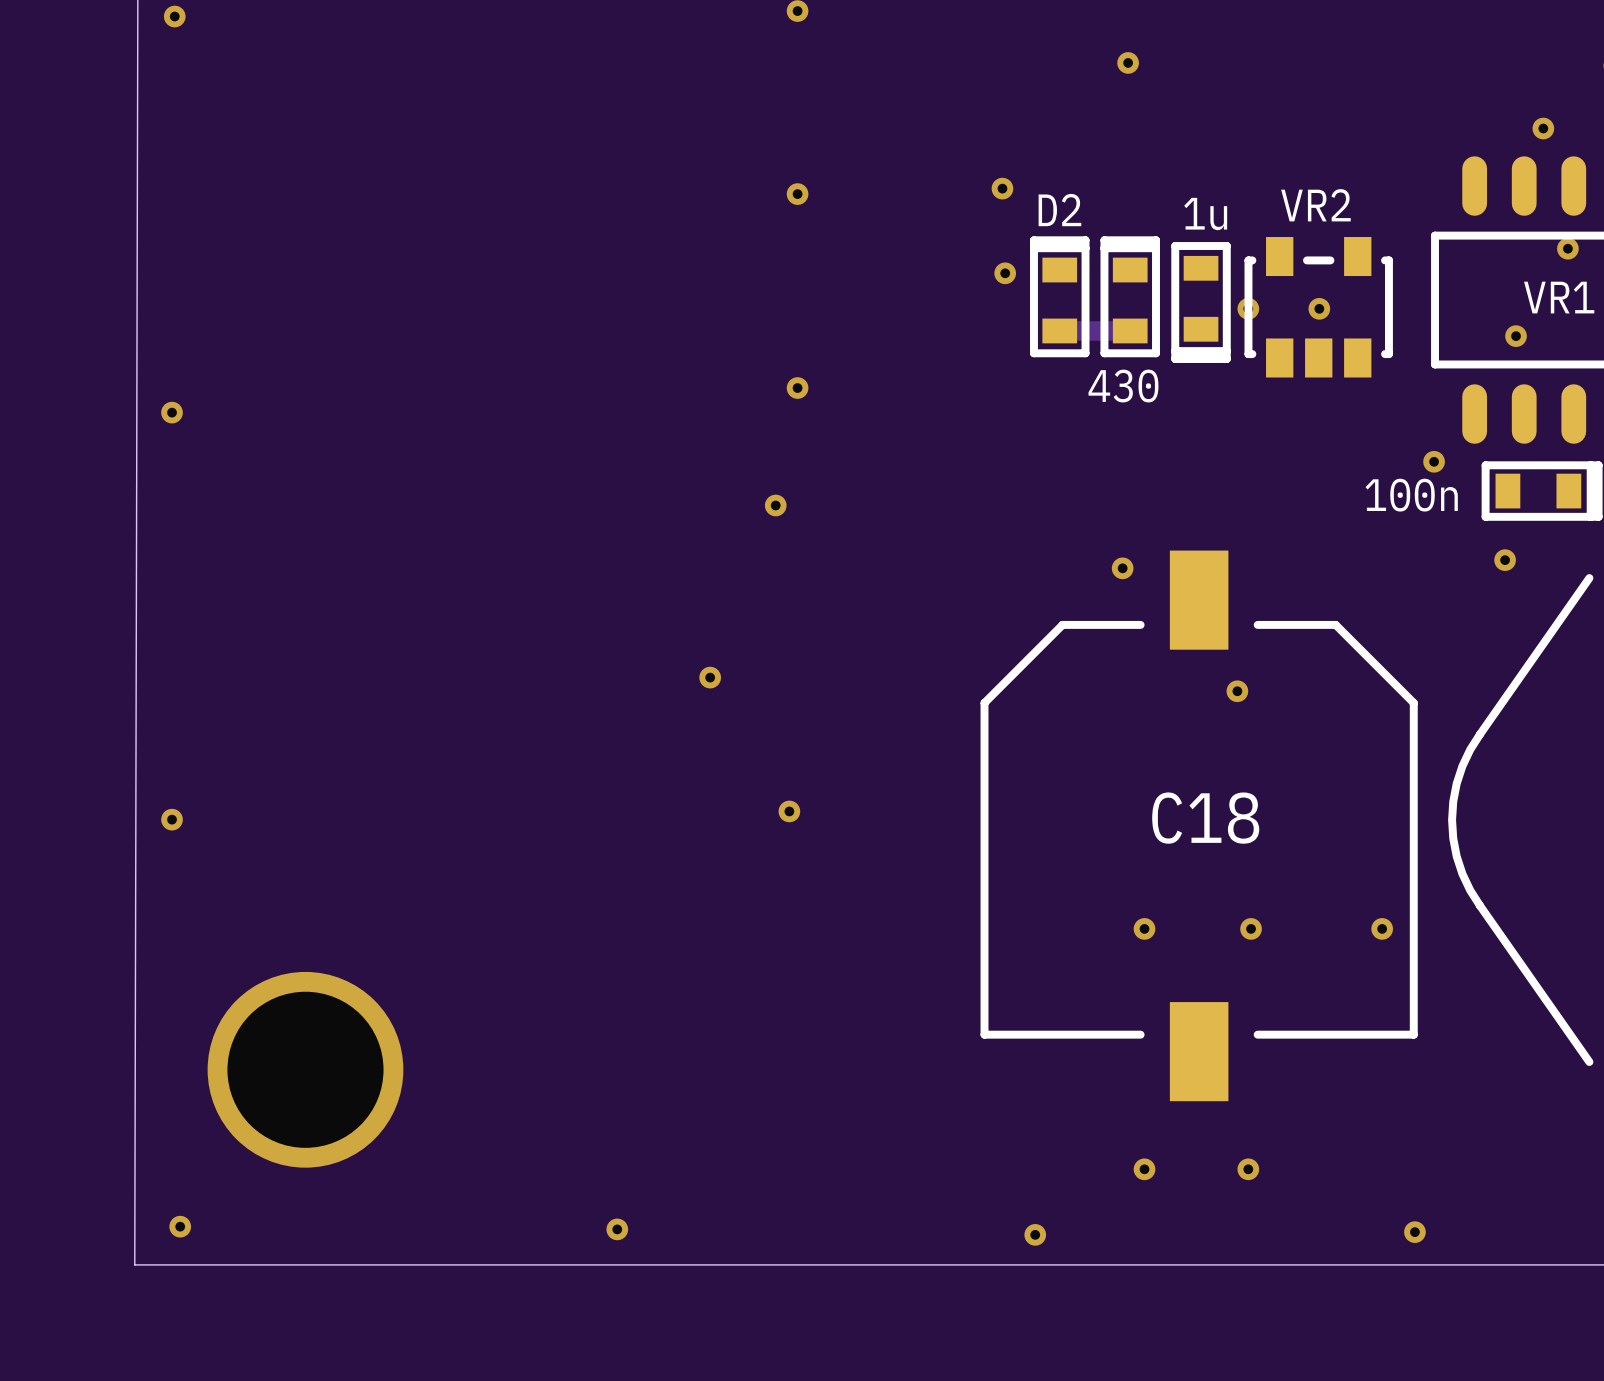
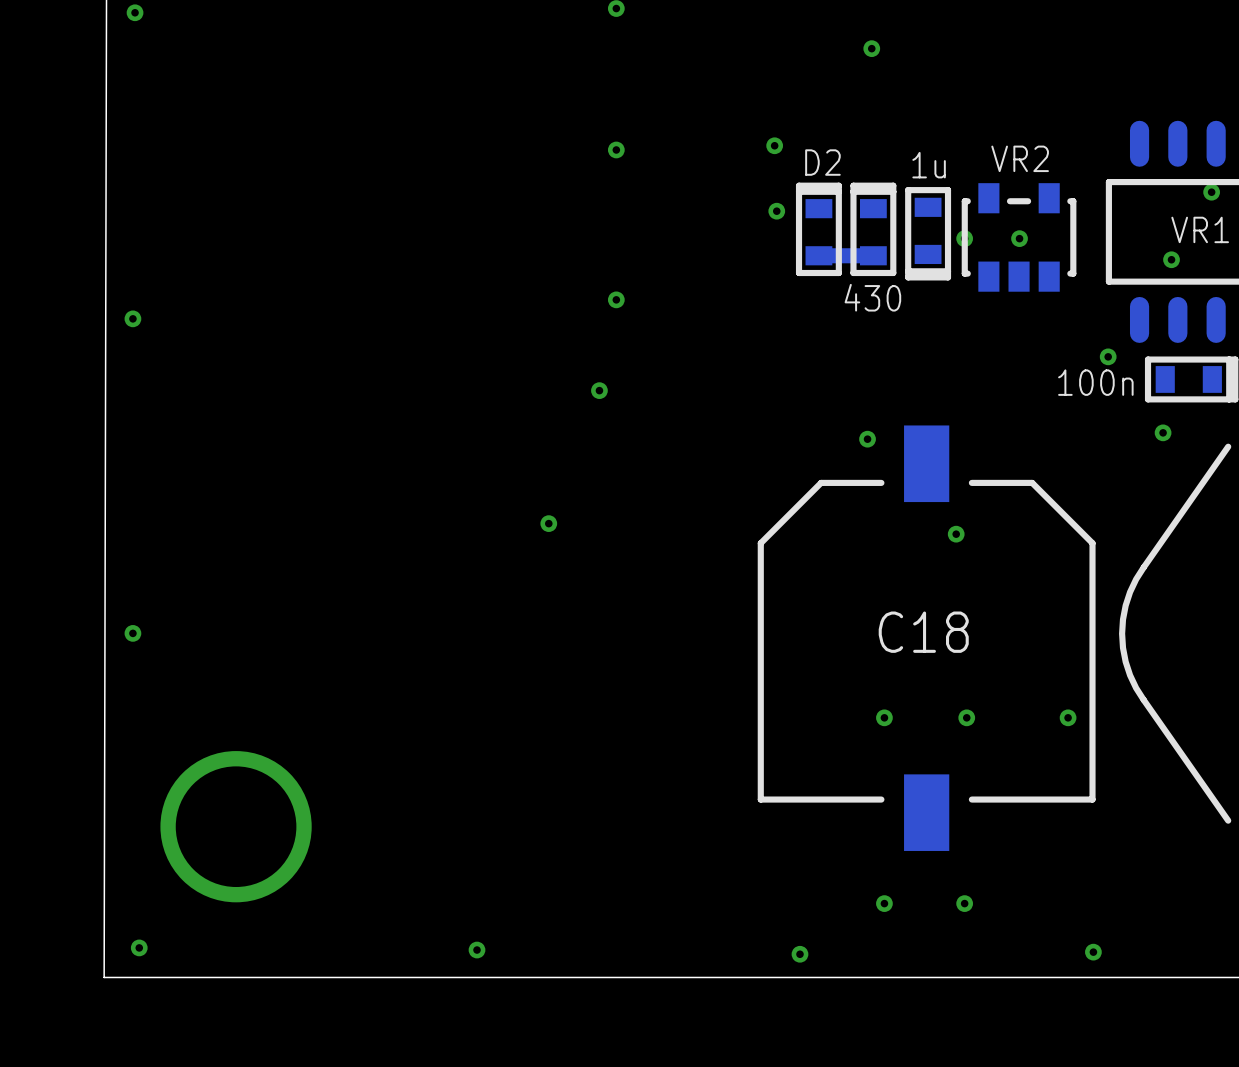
via: (1543, 128) -> none
via: (789, 811) -> none

